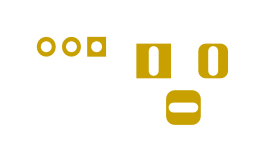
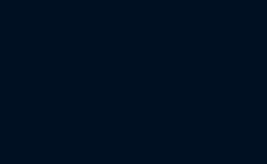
part: (71, 46) -> none
part: (182, 84) -> none

